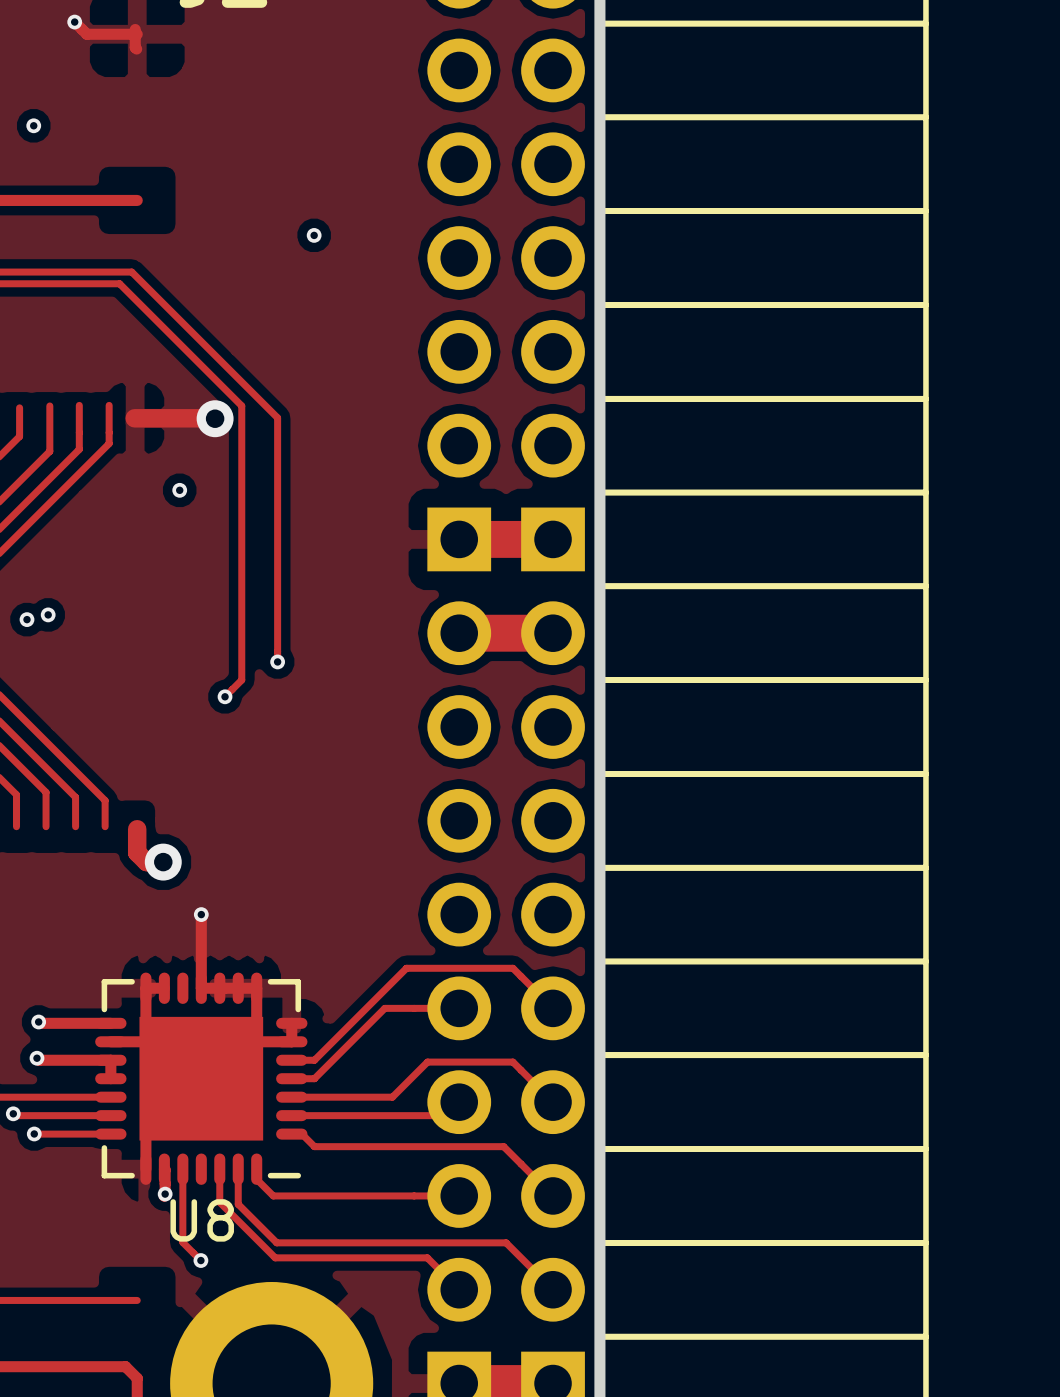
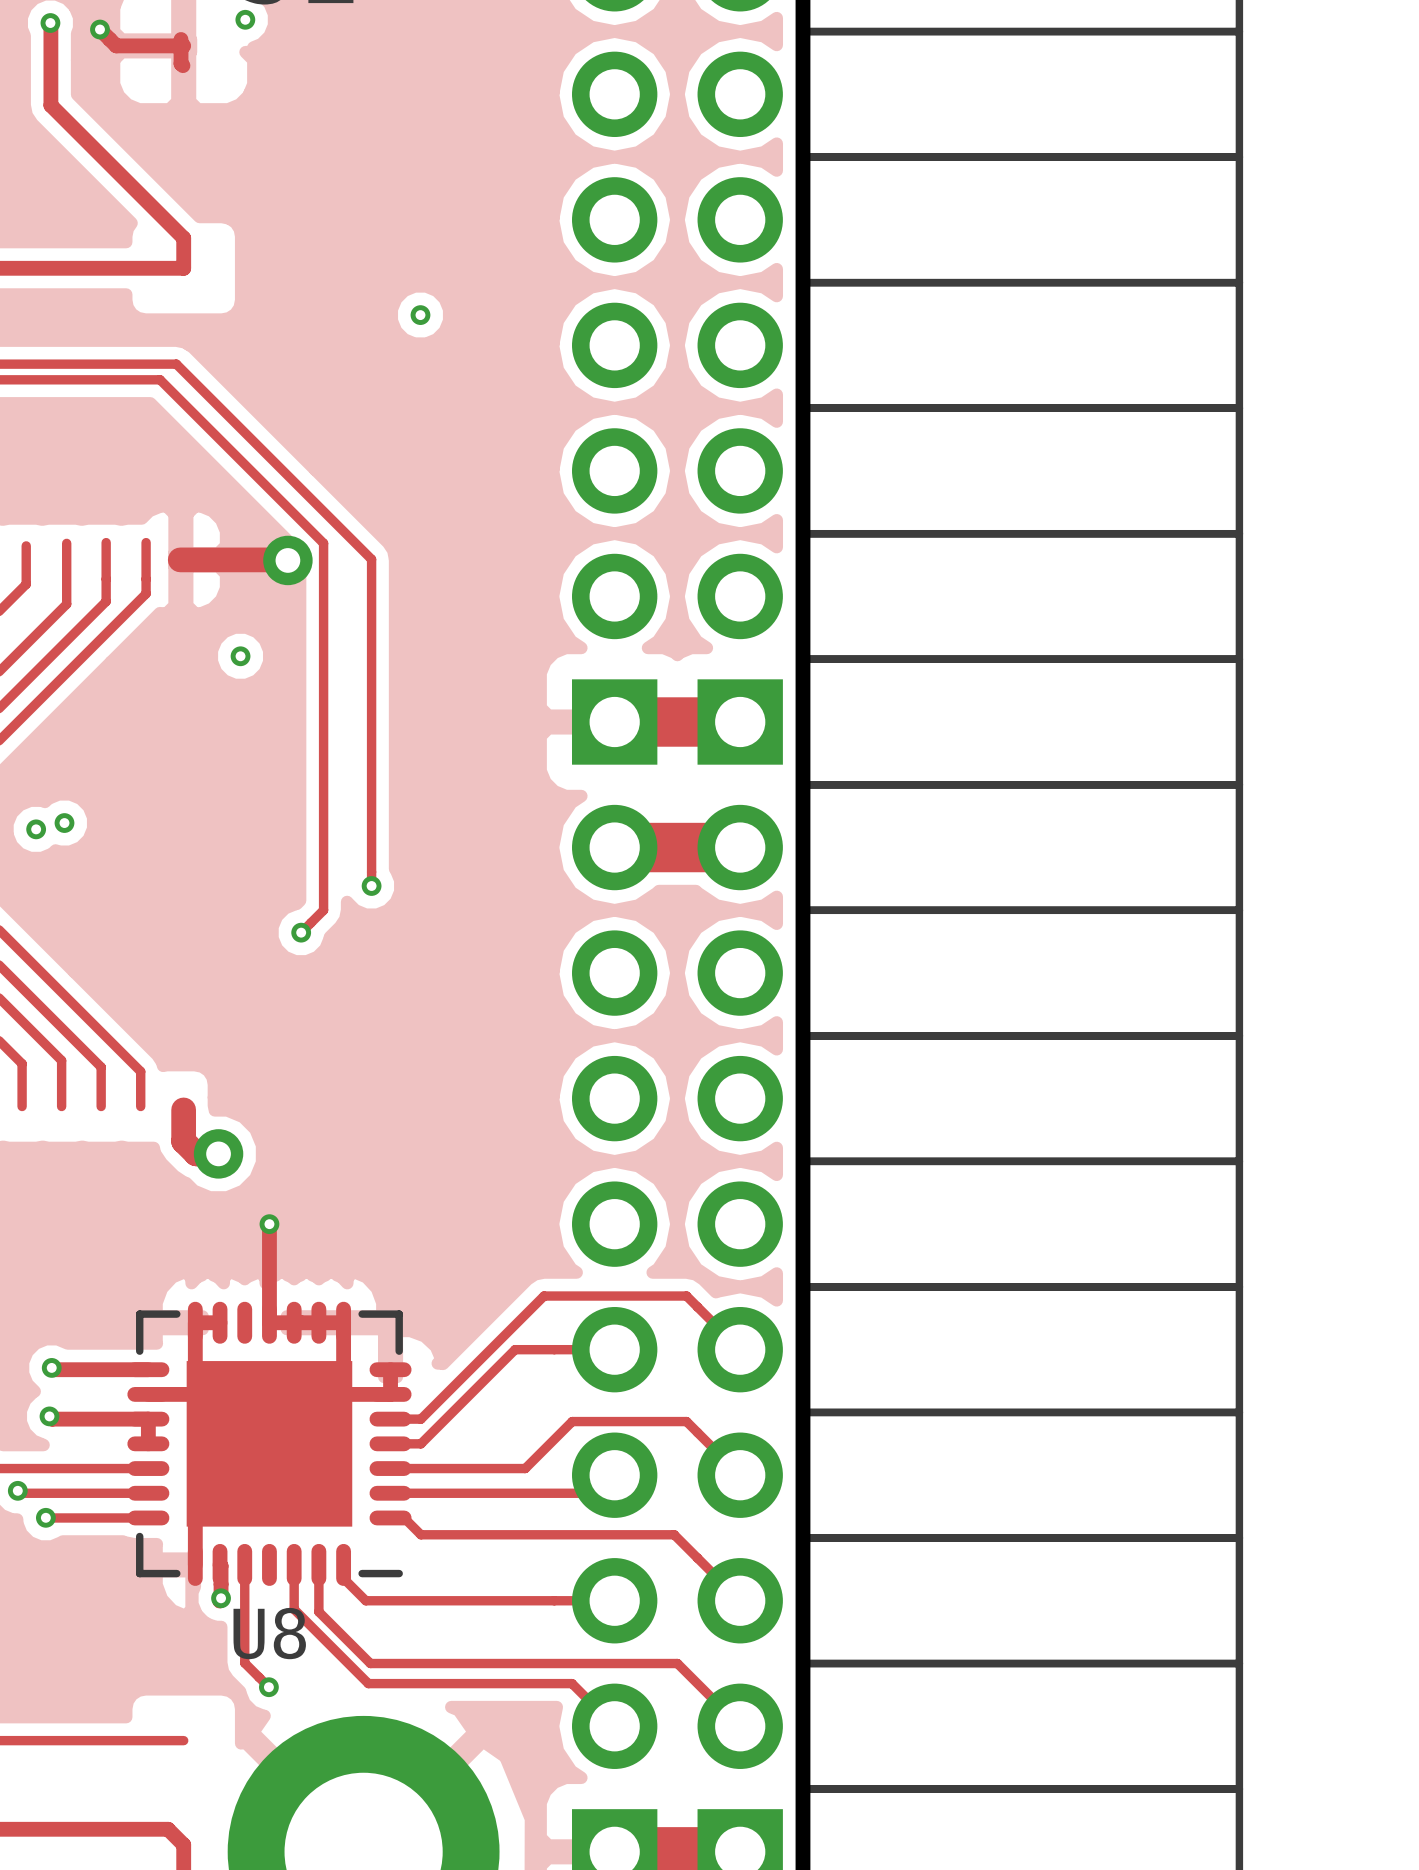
via: none -> (245, 19)
via: none -> (50, 23)
track: none -> (50, 23) (50, 105) (183, 238) (183, 268)
via: (33, 125) -> none

